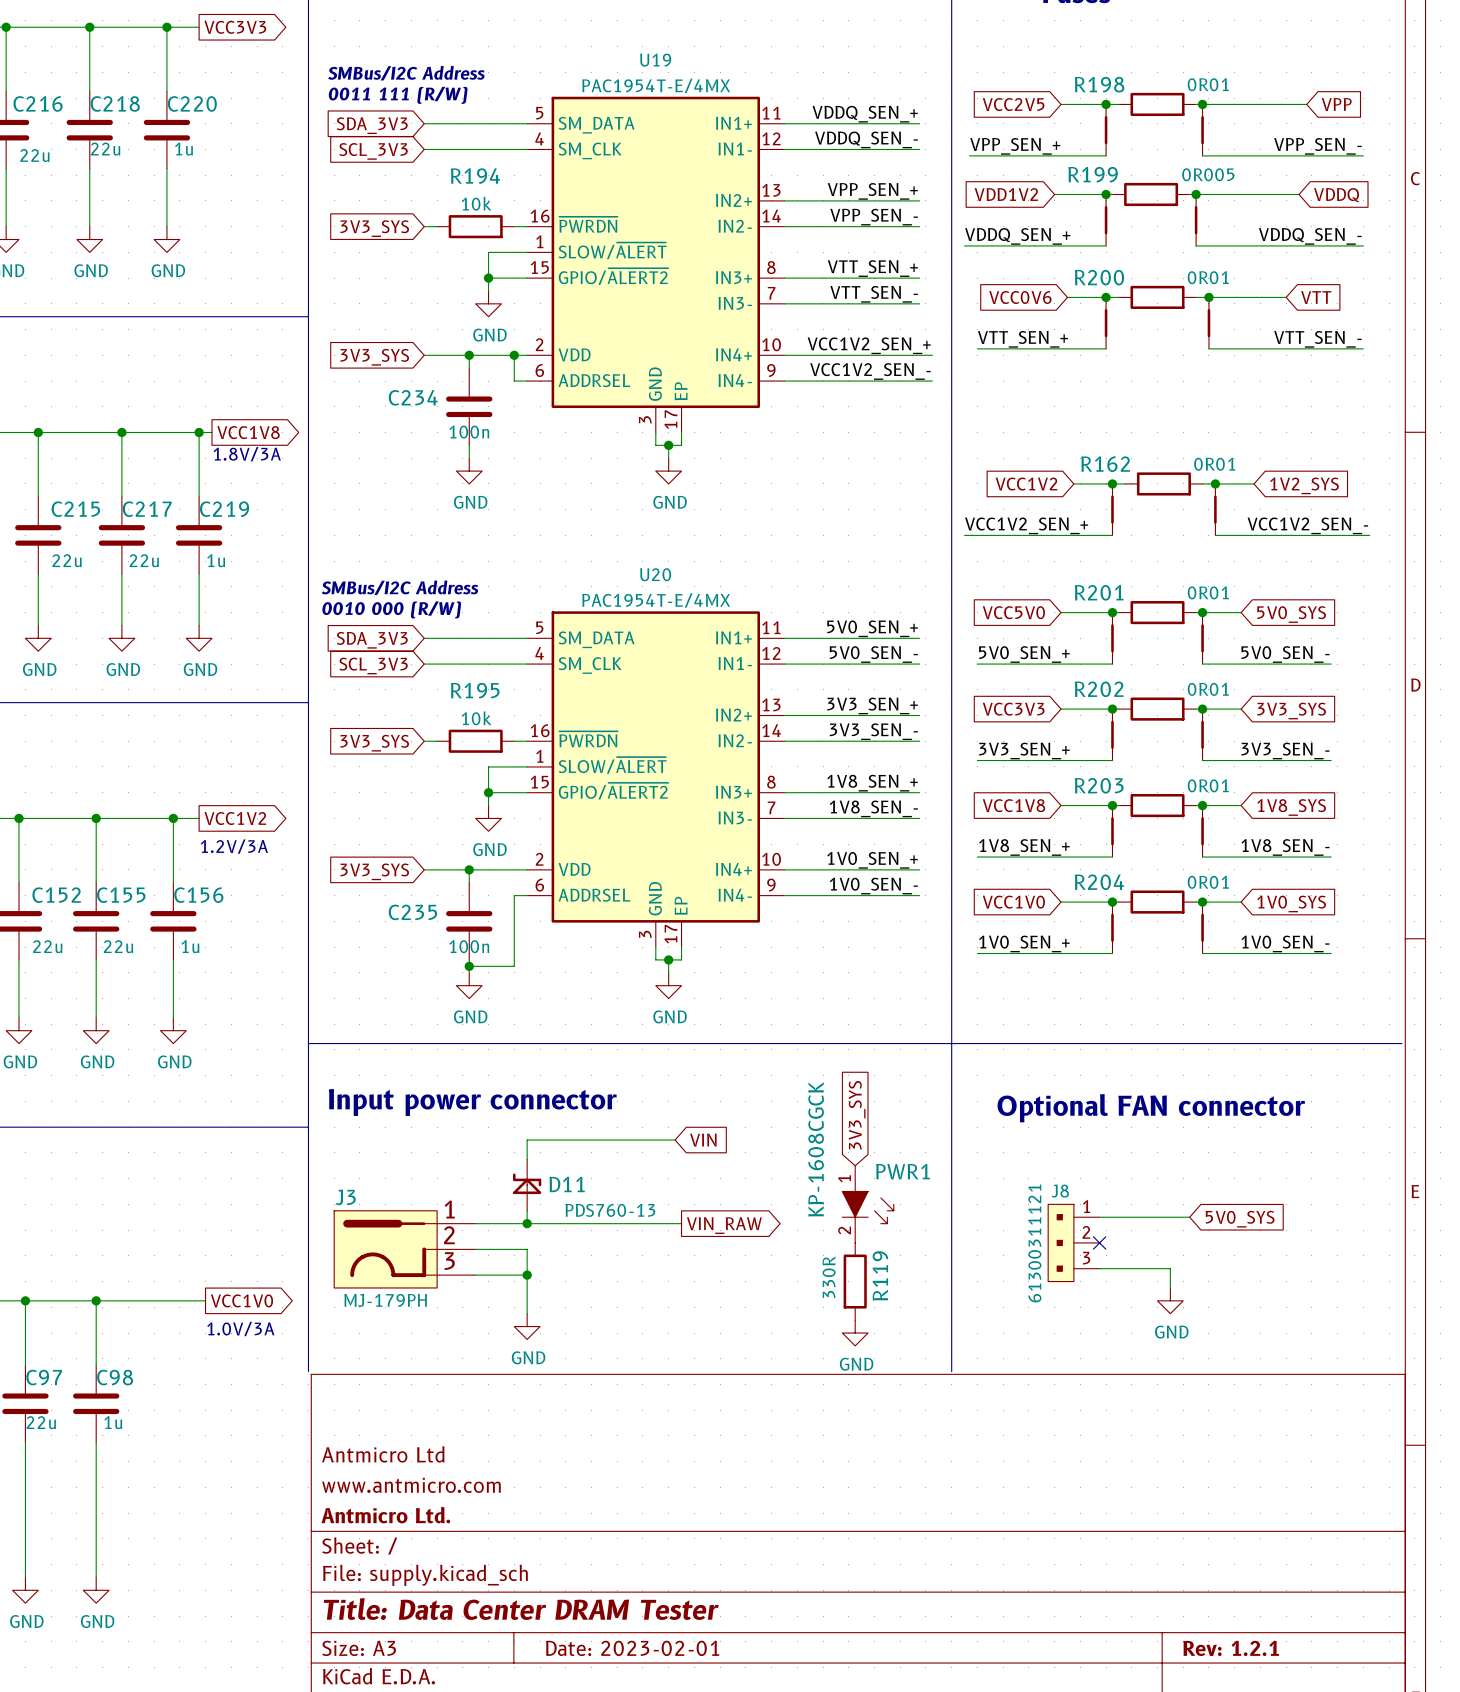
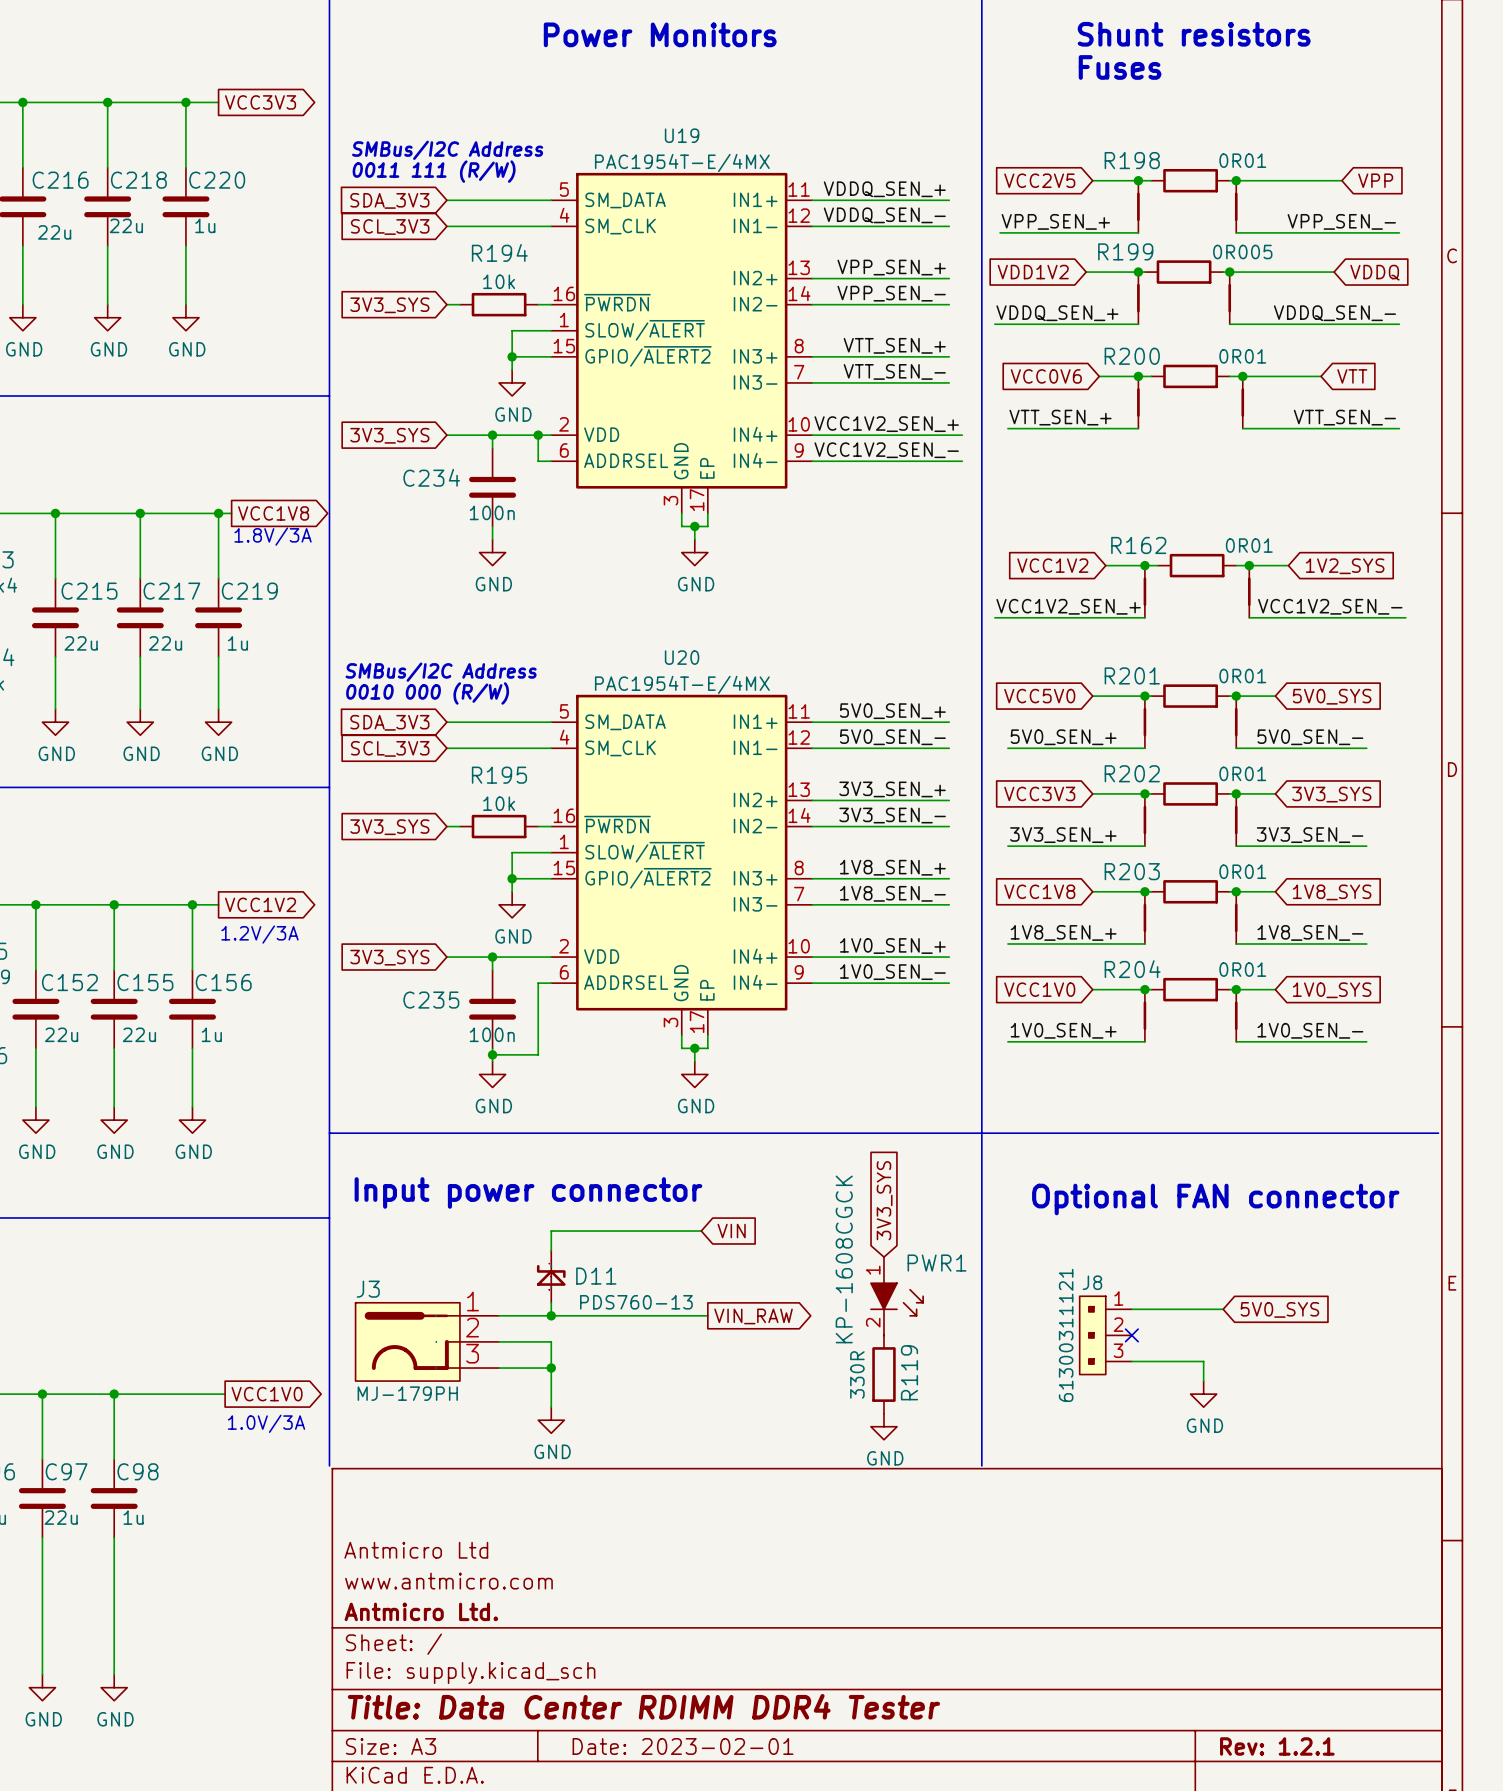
title block: Title: Data Center DRAM Tester (521, 1609) -> Title: Data Center RDIMM DDR4 Tester (643, 1706)

